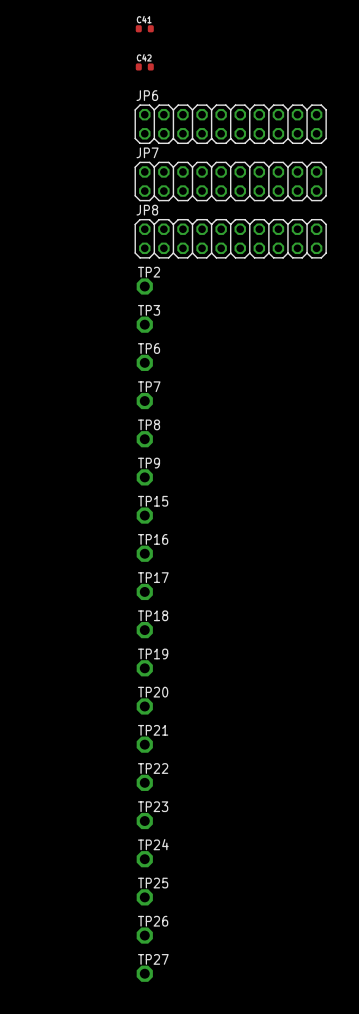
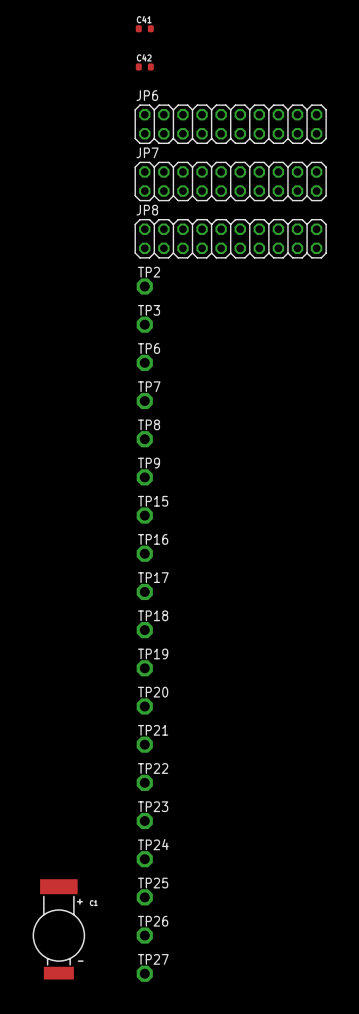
part: none -> (58, 929)

